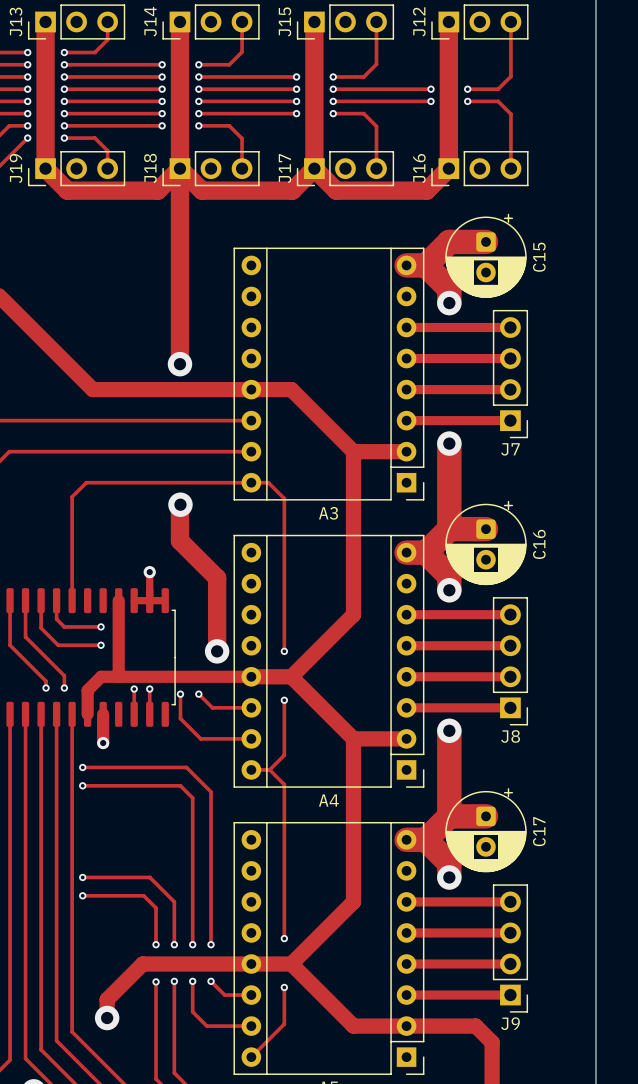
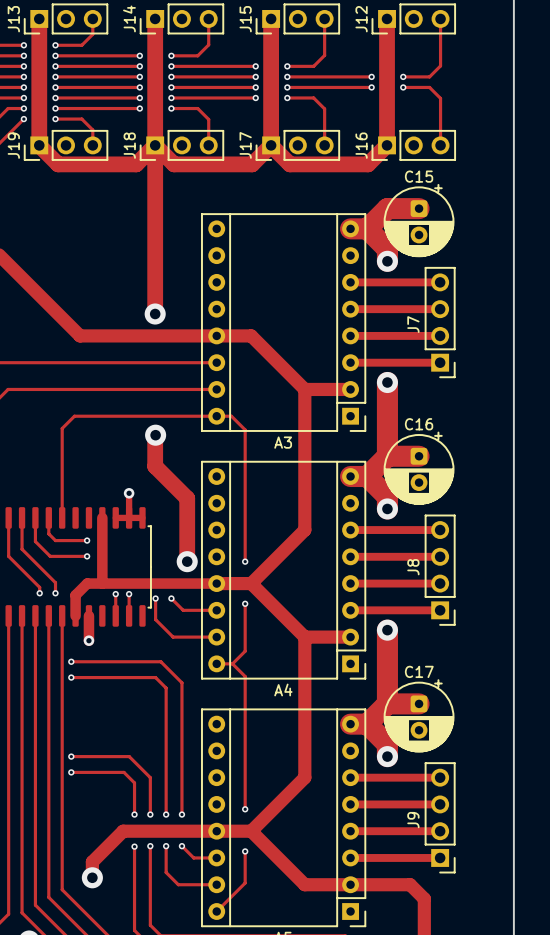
C15 name rotation: 0° (539, 257) -> 90° clockwise (419, 176)
C15 name position: C15 (539, 257) -> C15 (419, 176)
J7 name rotation: 0° (510, 449) -> 90° counterclockwise (413, 324)
J7 name position: J7 (510, 449) -> J7 (413, 324)
C16 name rotation: 0° (539, 544) -> 90° clockwise (419, 424)
C16 name position: C16 (539, 544) -> C16 (419, 424)
J8 name rotation: 0° (510, 736) -> 90° counterclockwise (413, 567)
J8 name position: J8 (510, 736) -> J8 (413, 567)
C17 name rotation: 0° (539, 831) -> 90° clockwise (419, 671)
C17 name position: C17 (539, 831) -> C17 (419, 671)
J9 name rotation: 0° (510, 1023) -> 90° counterclockwise (413, 820)
J9 name position: J9 (510, 1023) -> J9 (413, 820)

